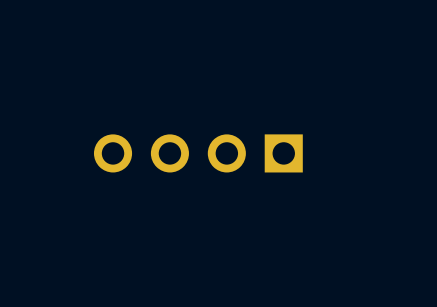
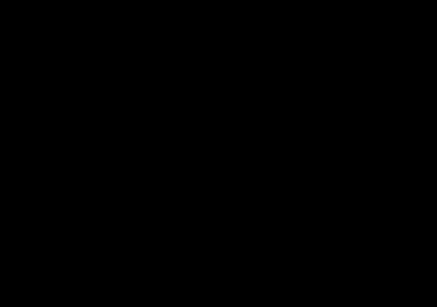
part: (198, 153) -> none

